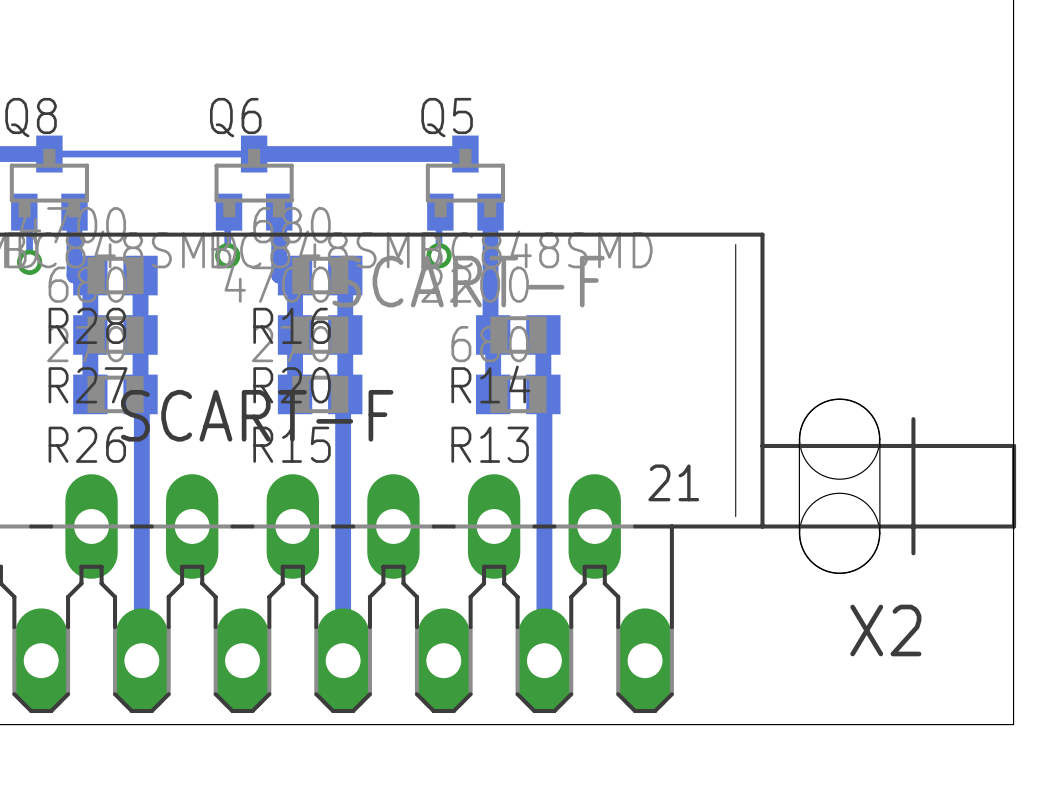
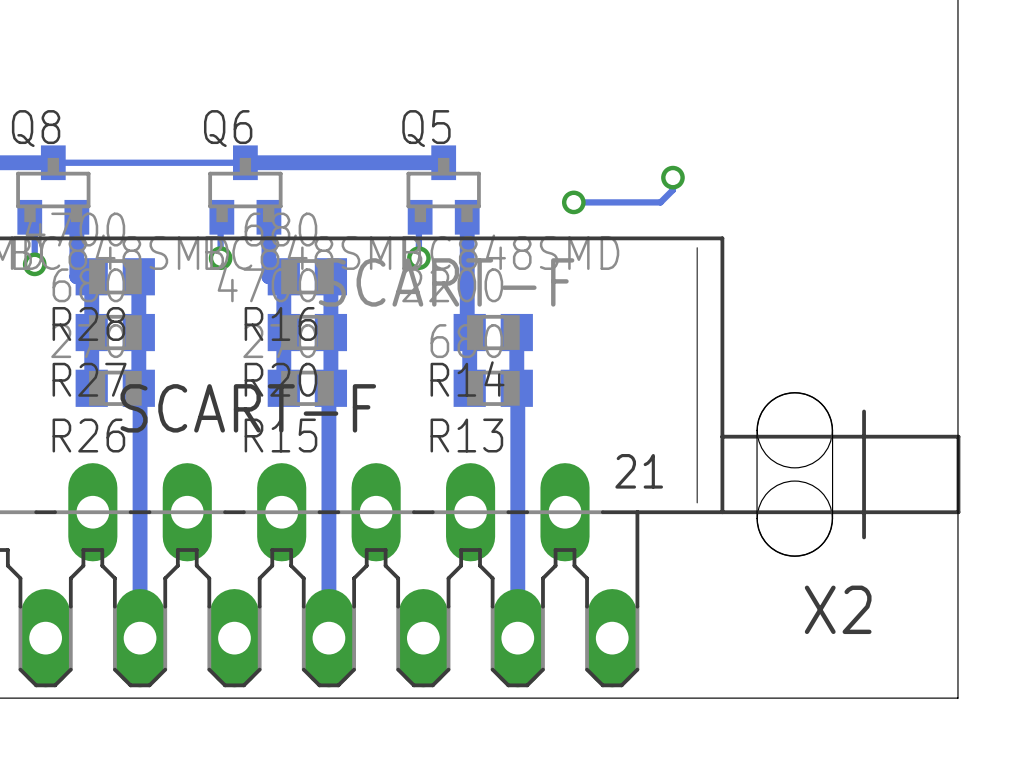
track: none -> (672, 177) (672, 190) (660, 202) (573, 202)
via: none -> (672, 177)
via: none -> (573, 202)

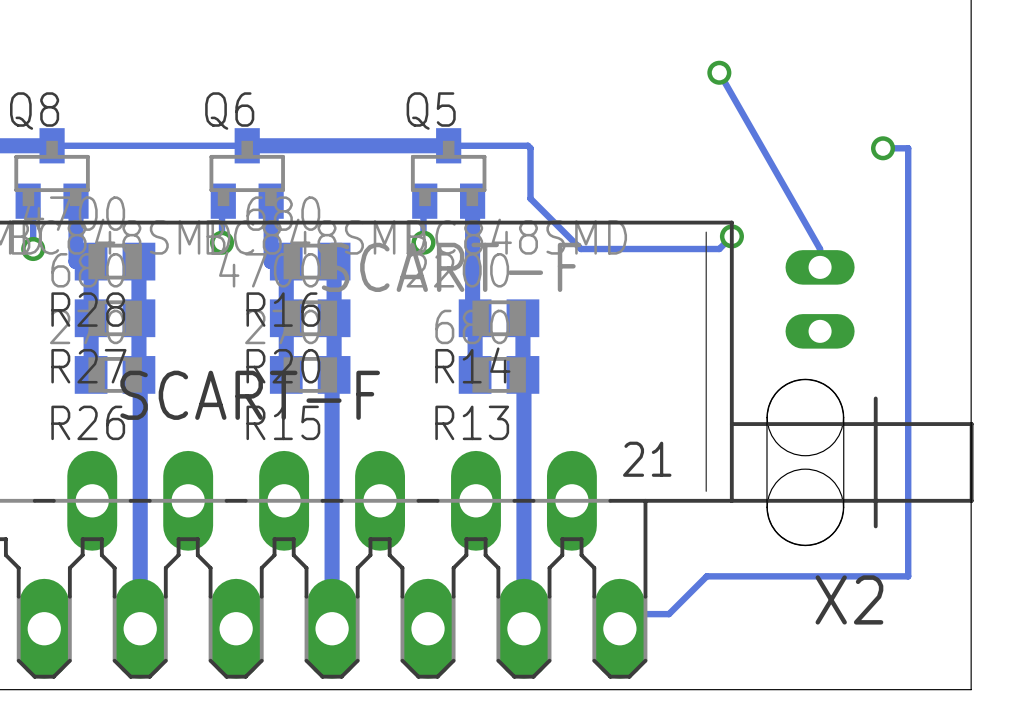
track: none -> (719, 72) (820, 249) (820, 267)
via: none -> (719, 72)
track: none -> (448, 145) (527, 145) (530, 148) (530, 198) (580, 249) (719, 249) (731, 236)
track: none -> (883, 148) (908, 148) (908, 576) (706, 576) (668, 614) (634, 614) (619, 628)
via: none -> (883, 148)
track: (672, 177) (672, 190) (660, 202) (573, 202) -> none
via: (672, 177) -> none
via: (573, 202) -> none
via: none -> (731, 236)
part: none -> (820, 299)

